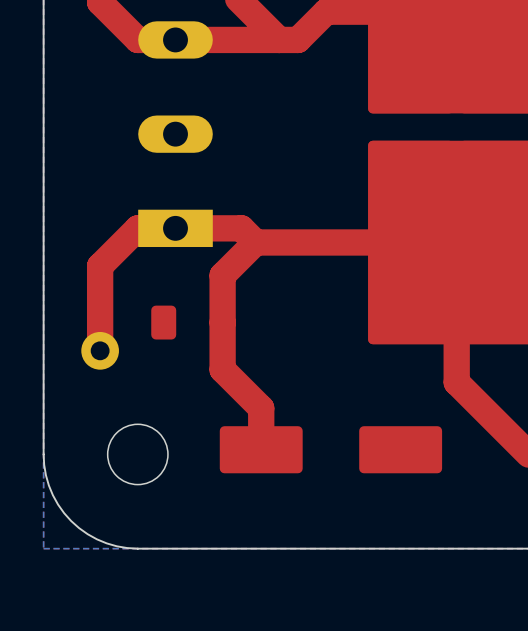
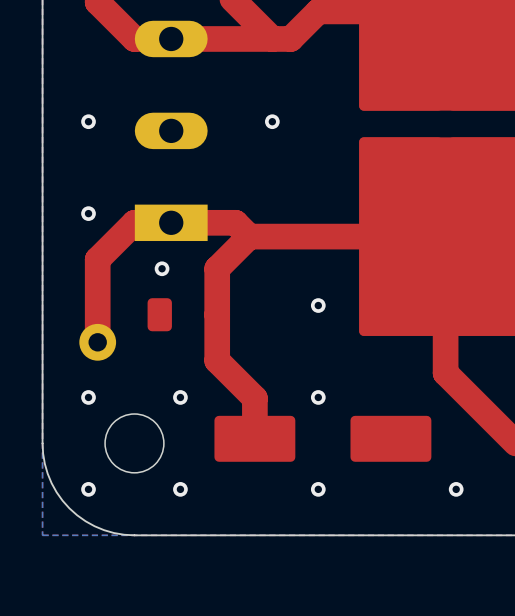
via: none -> (88, 121)
via: none -> (272, 121)
via: none -> (88, 213)
via: none -> (162, 268)
via: none -> (318, 305)
via: none -> (88, 397)
via: none -> (180, 397)
via: none -> (318, 397)
via: none -> (88, 489)
via: none -> (180, 489)
via: none -> (318, 489)
via: none -> (456, 489)

